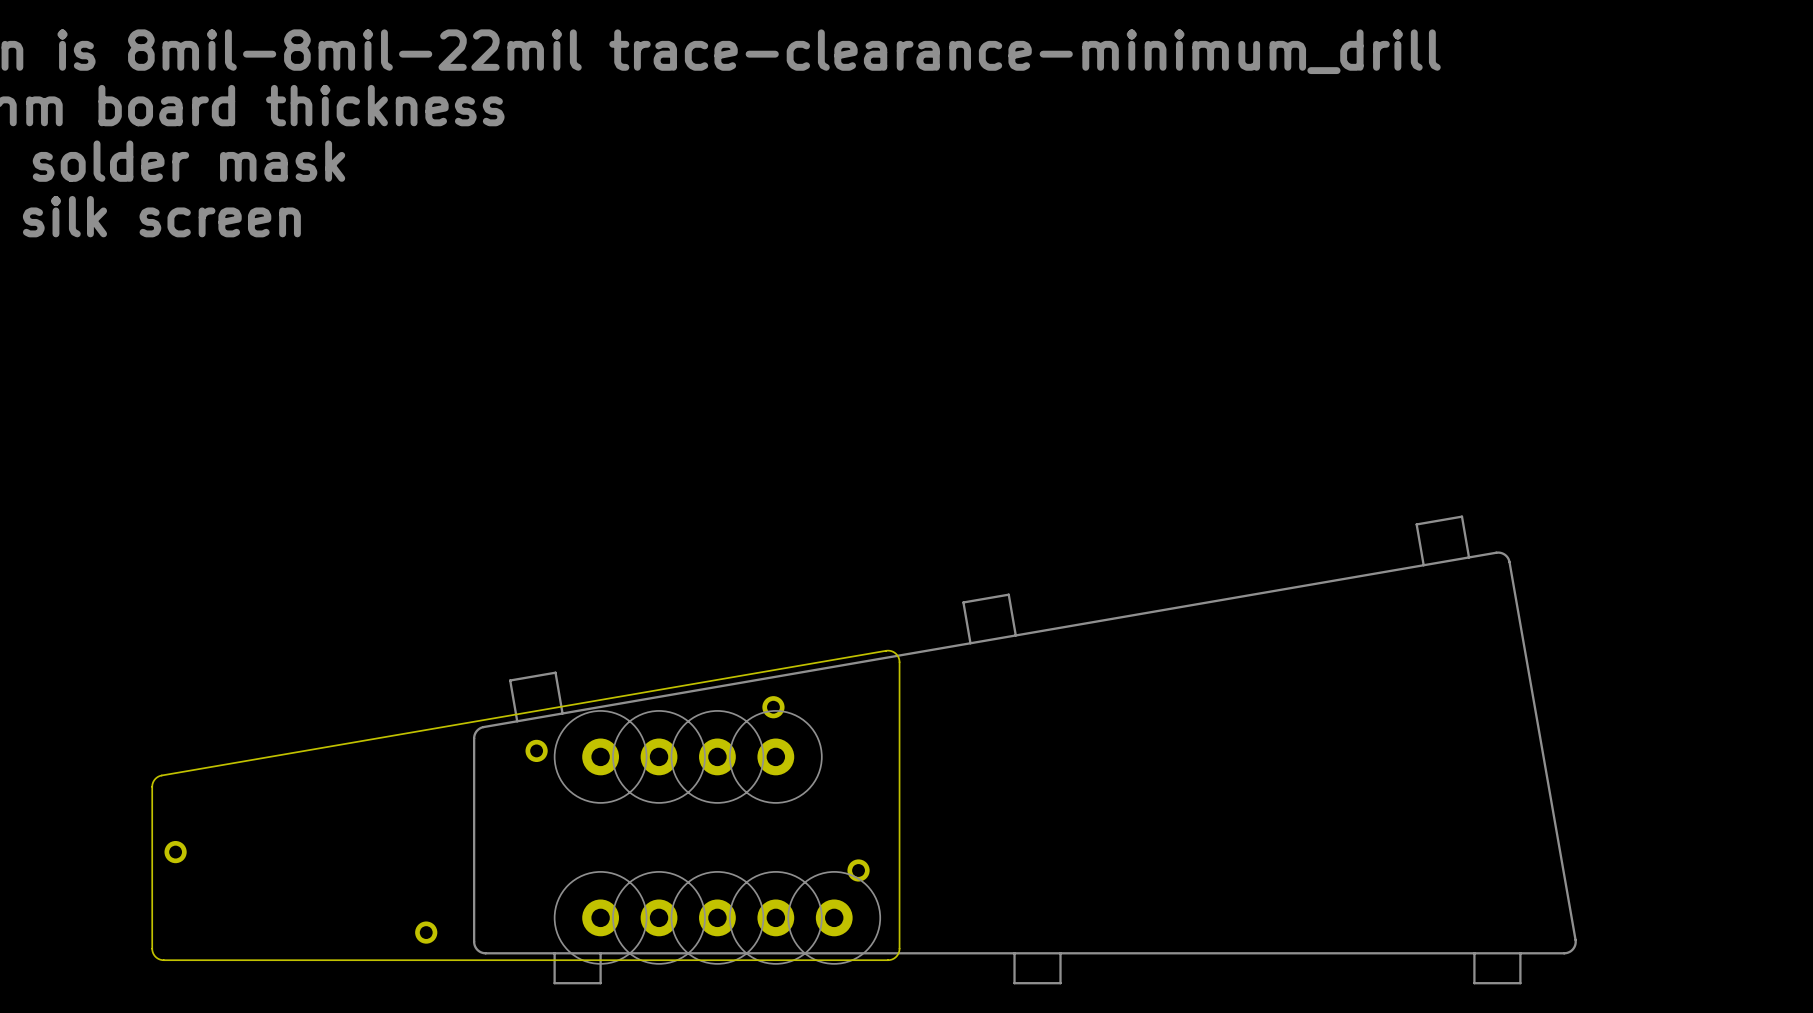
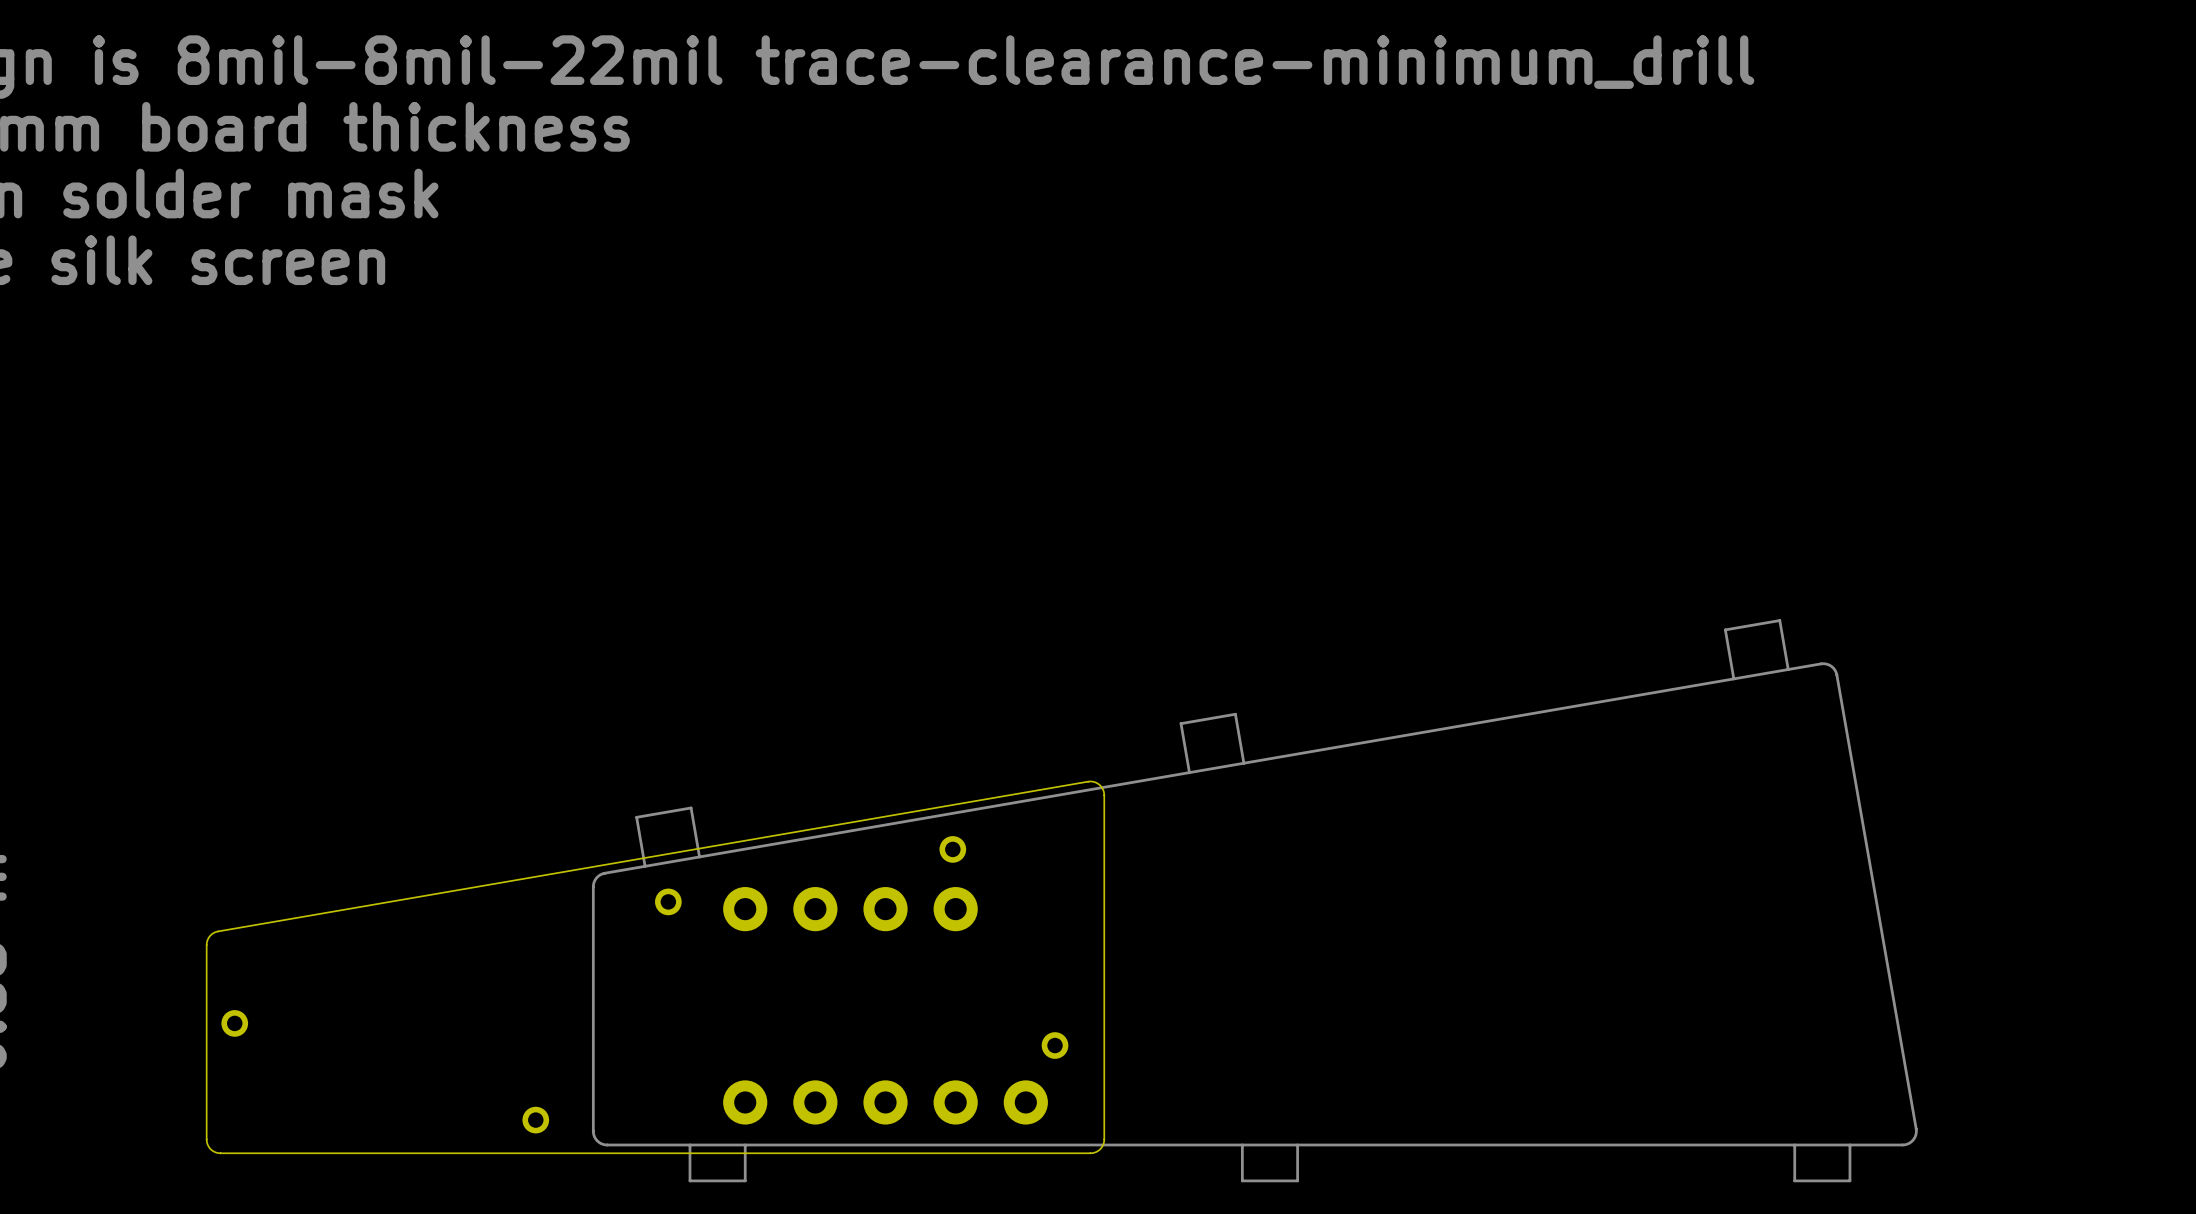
part footprint: [472, 515, 1577, 985] -> [591, 619, 1918, 1183]

